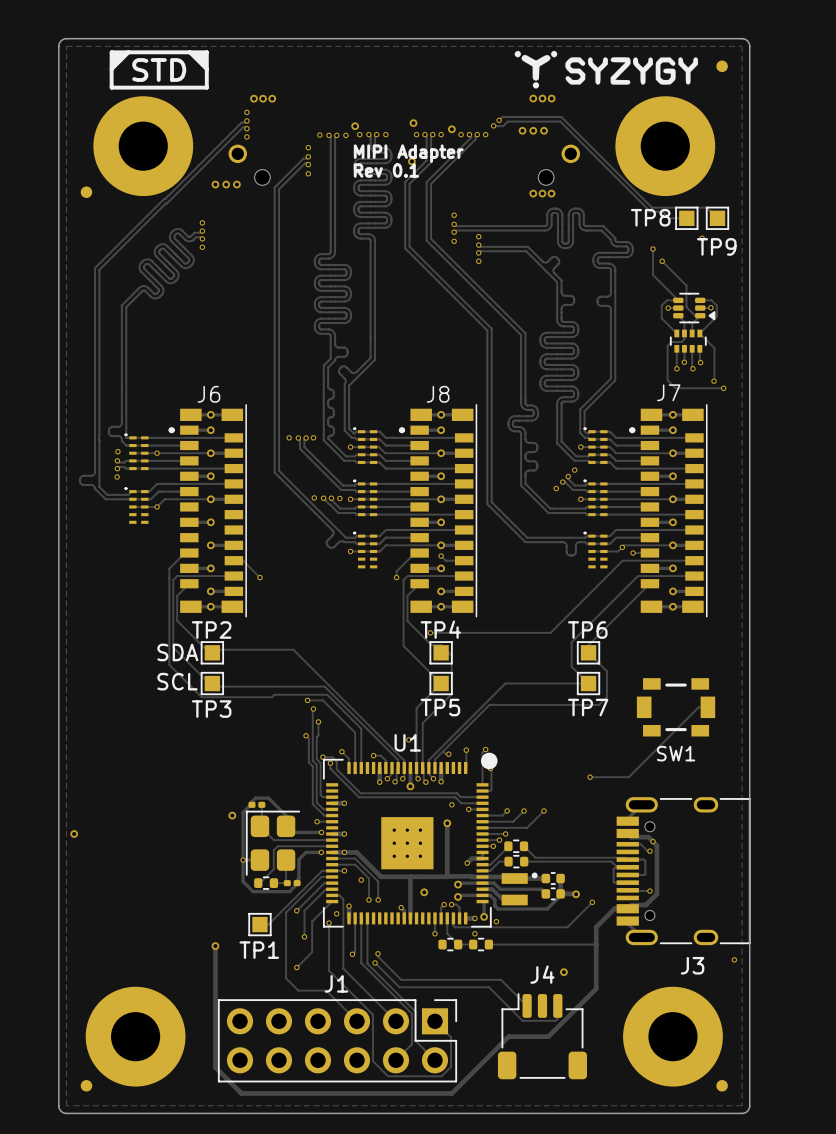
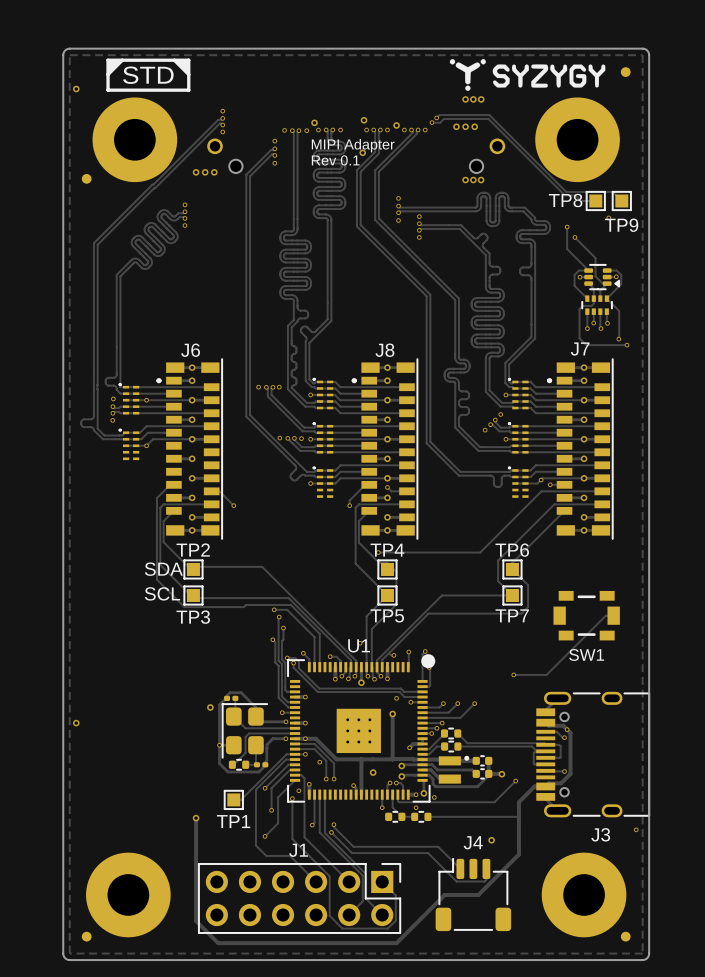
via: none -> (76, 89)
via: (253, 98) -> none
via: (263, 98) -> none
via: (272, 98) -> none

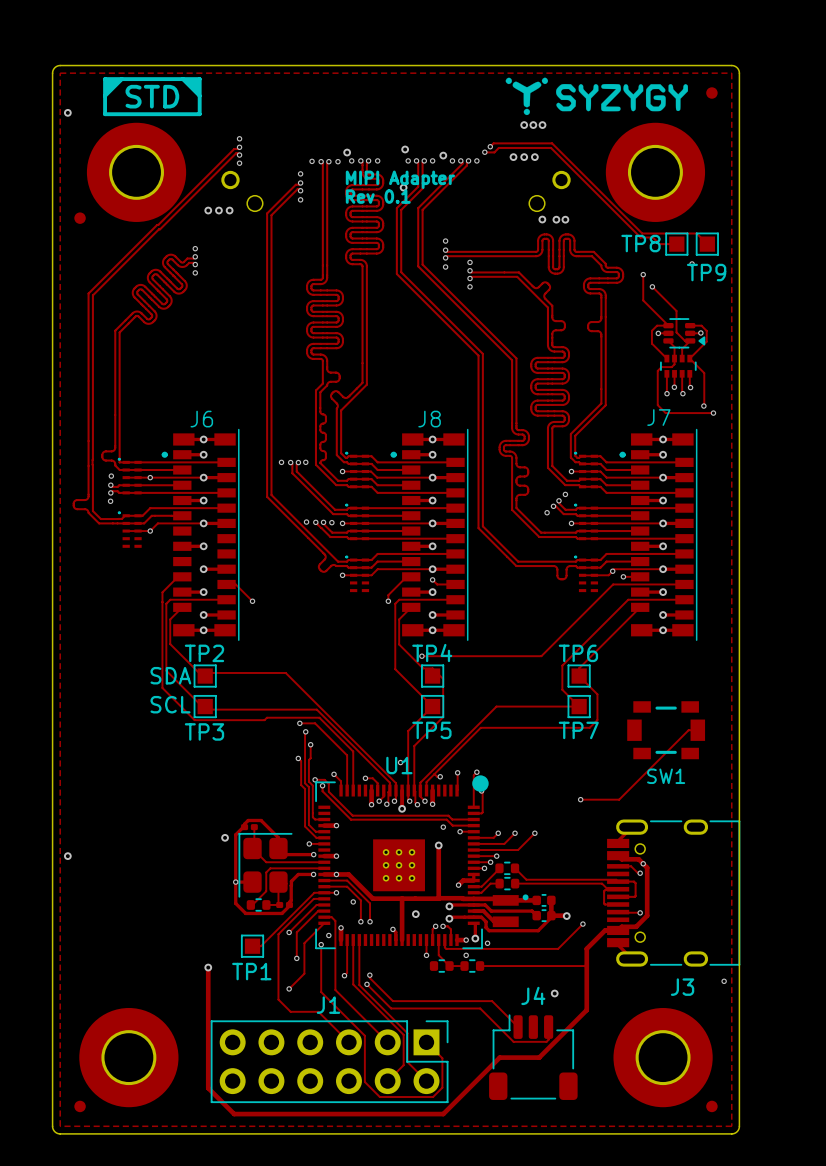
via: (465, 180) -> none
via: (473, 180) -> none
via: none -> (556, 219)
via: none -> (565, 219)

